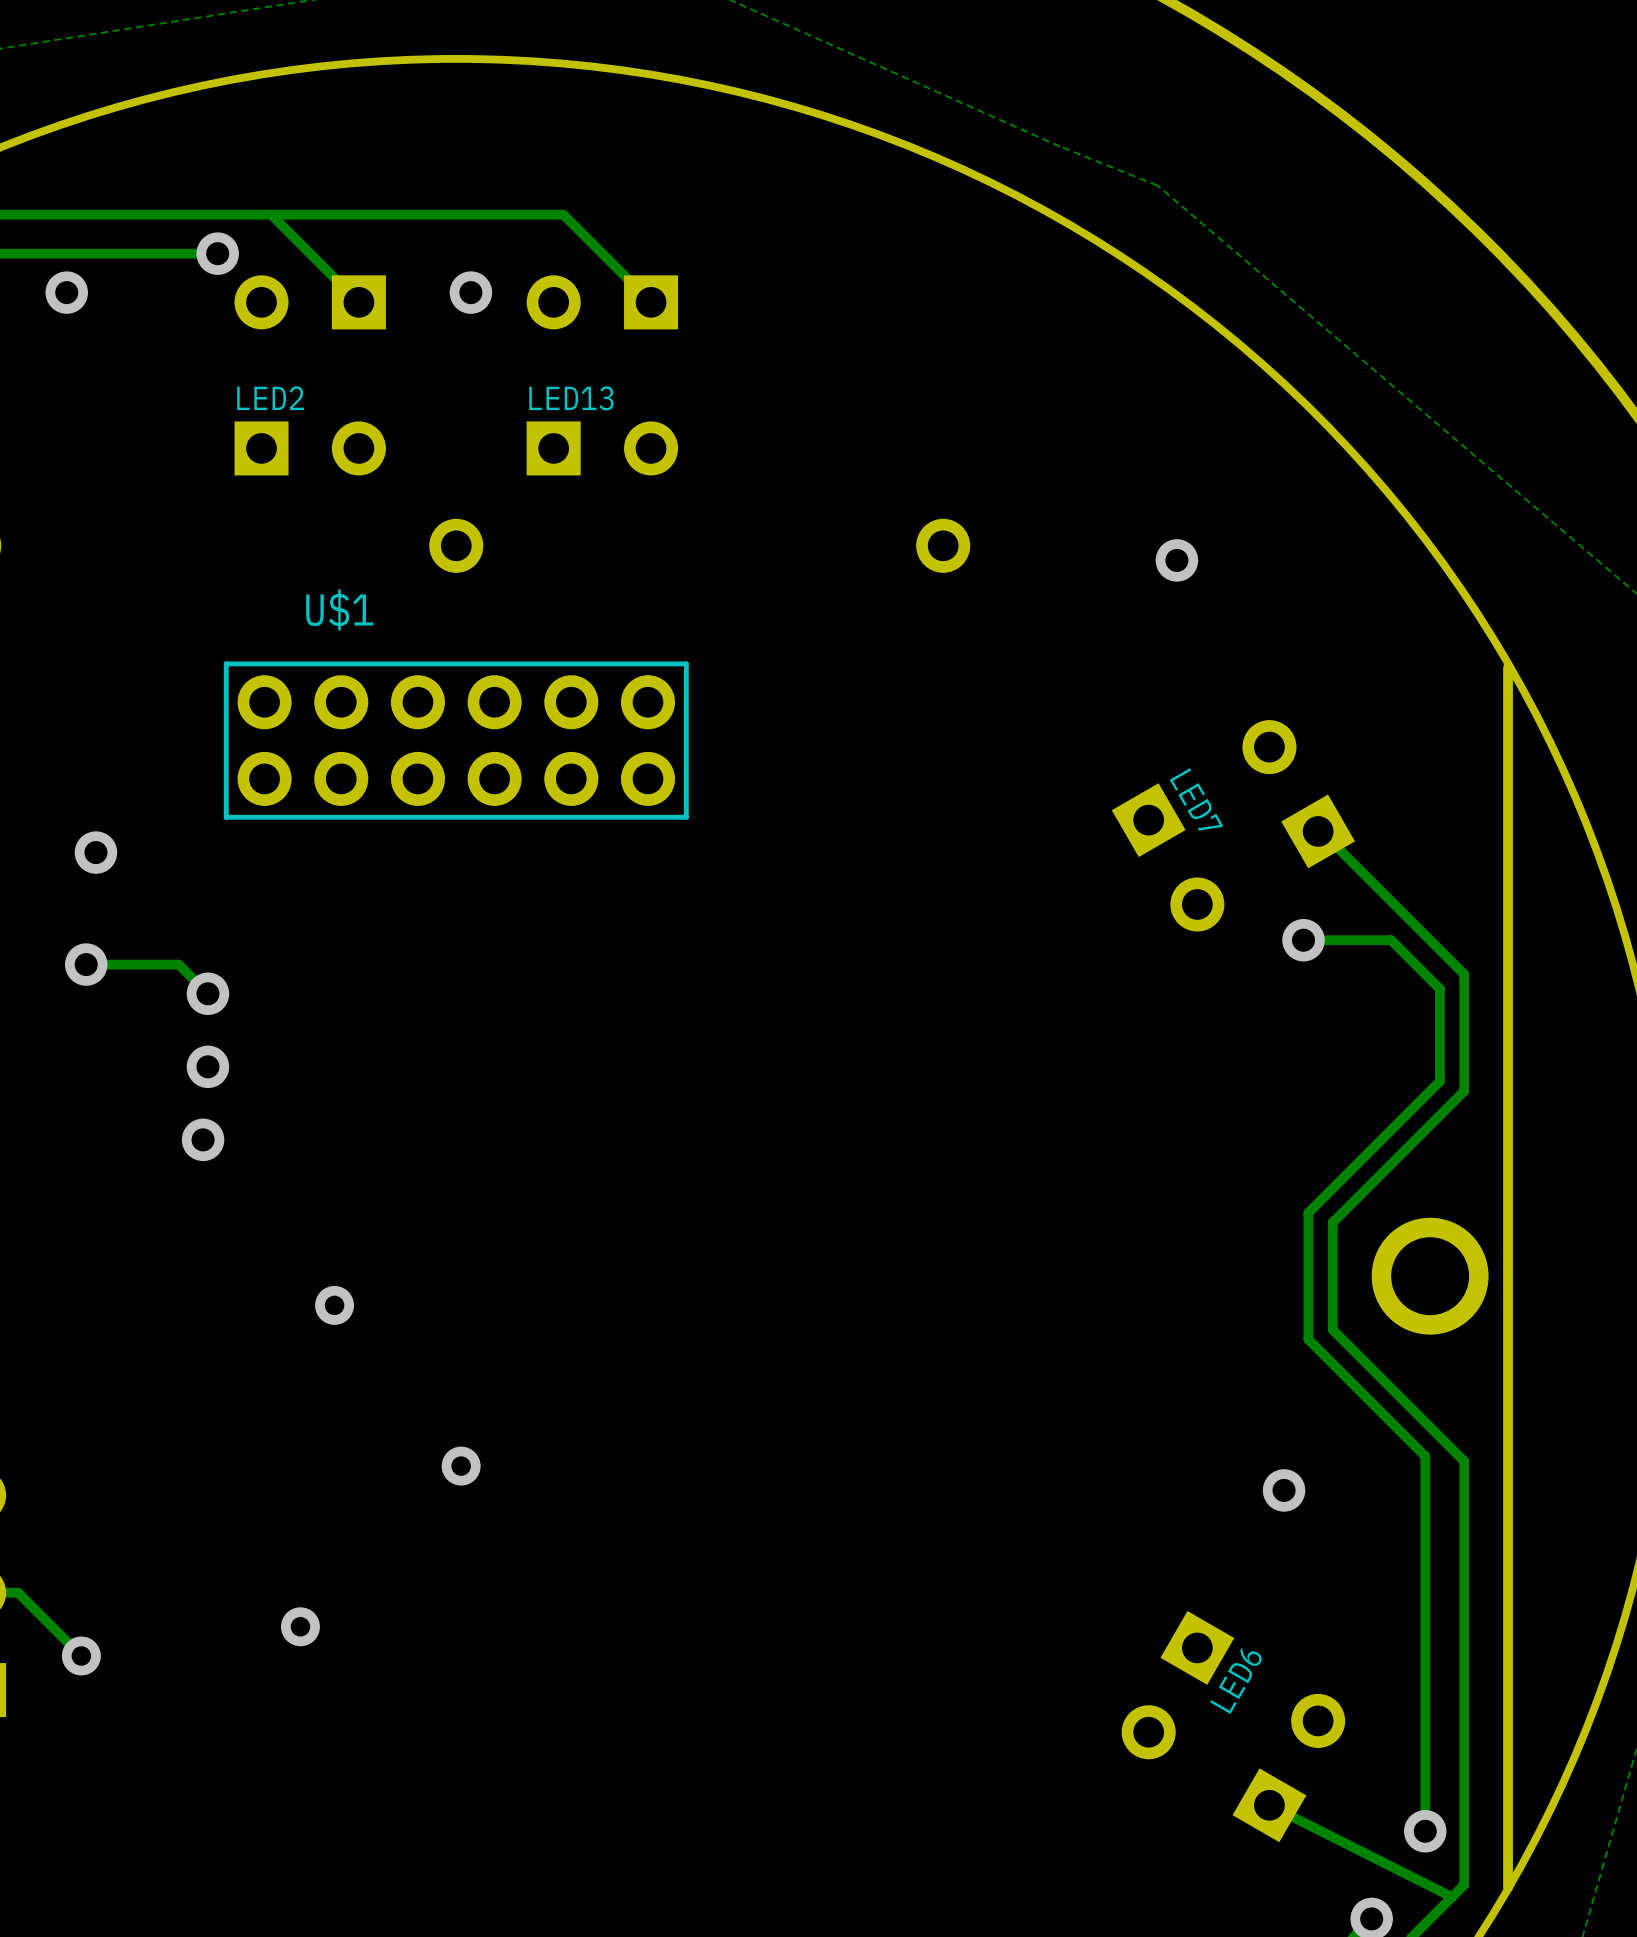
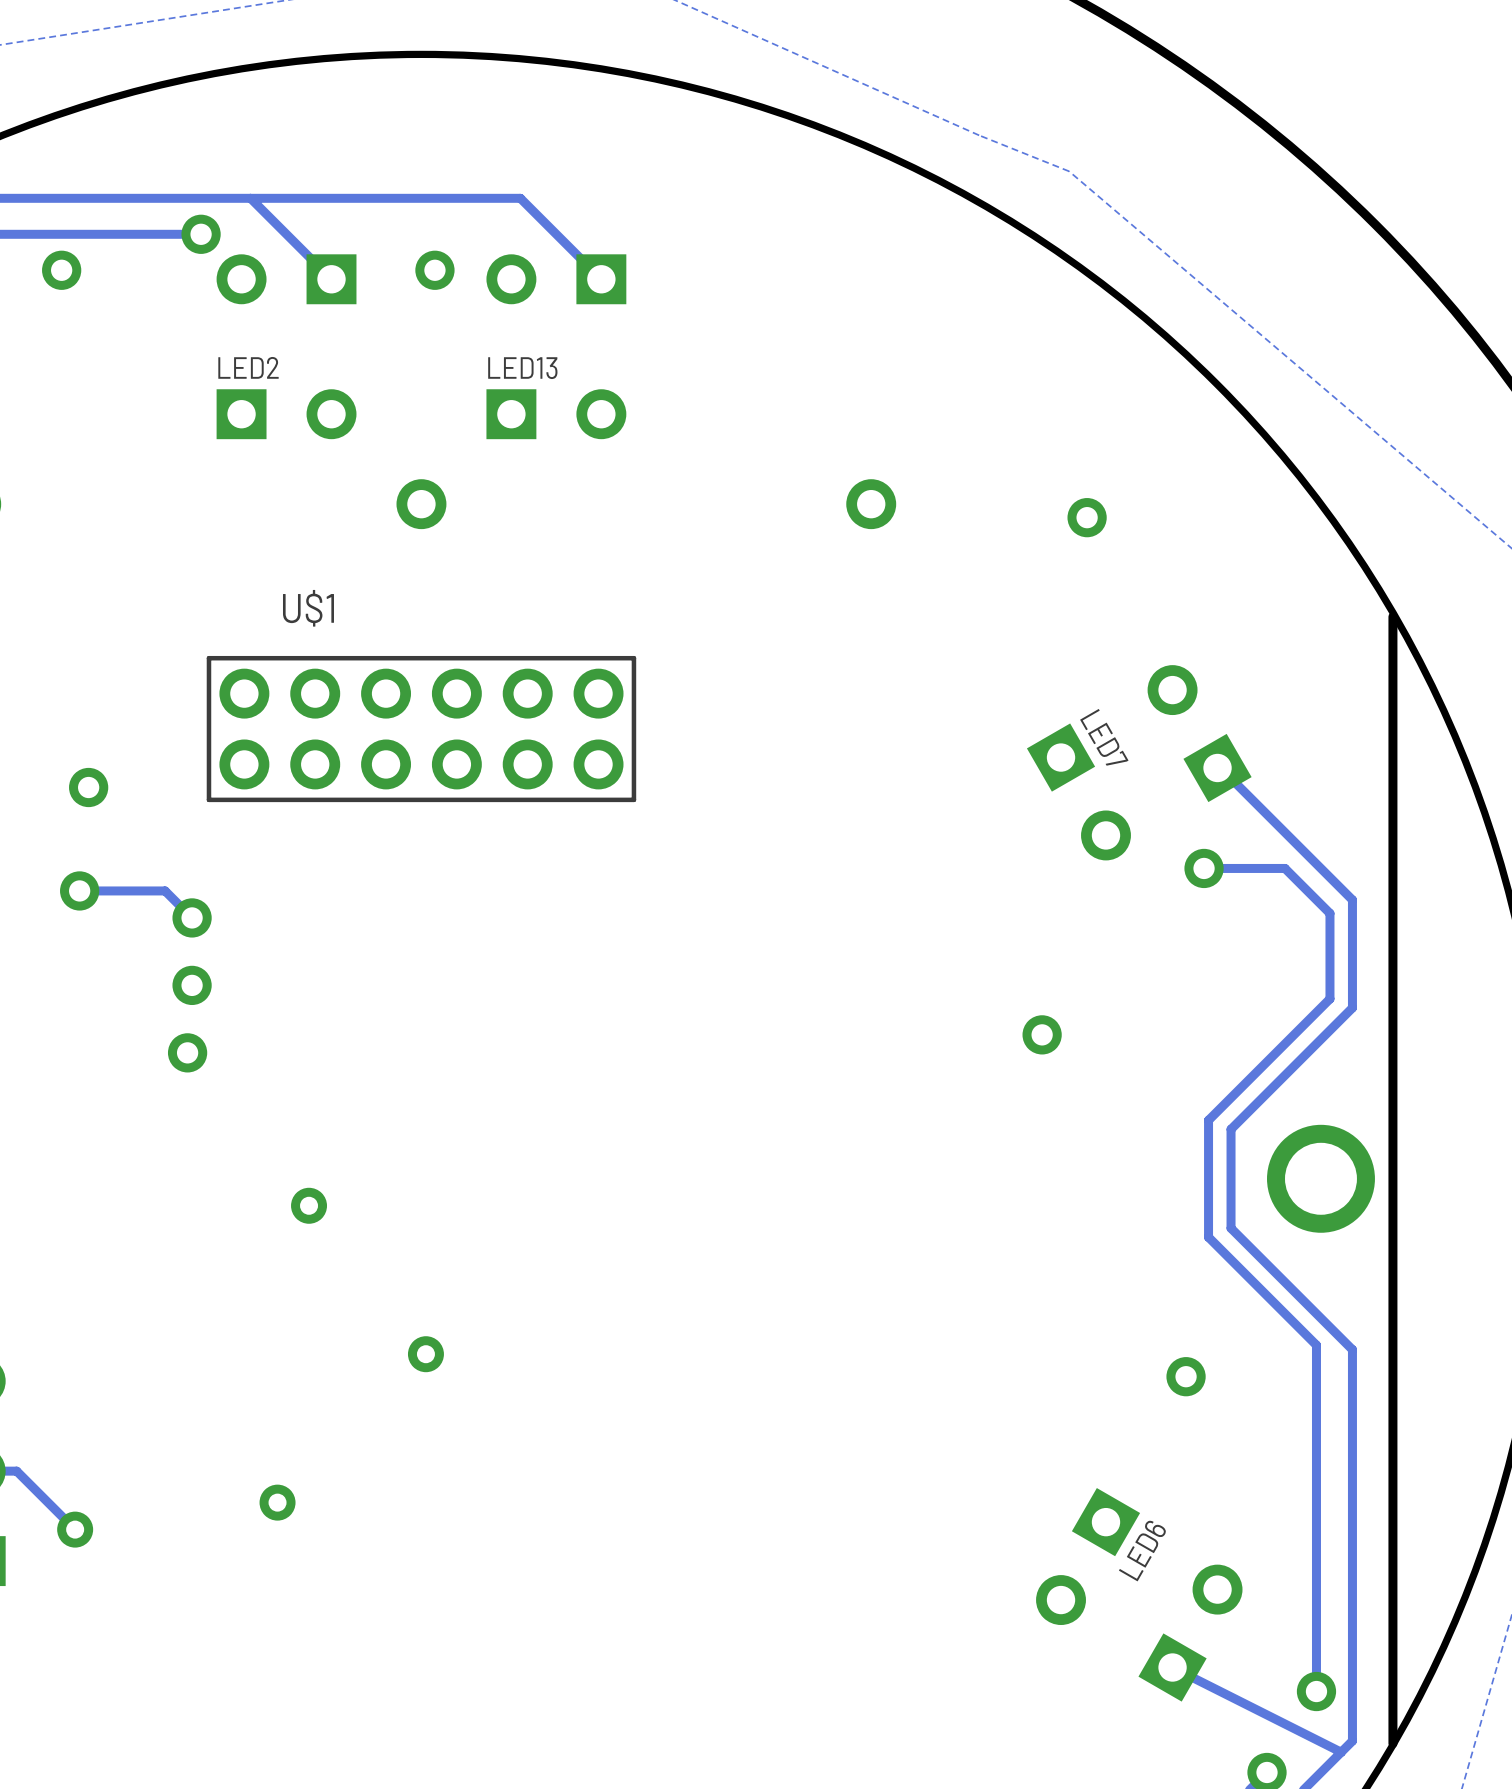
U$1 position: (456, 740) -> (421, 729)
via: none -> (1042, 1034)

